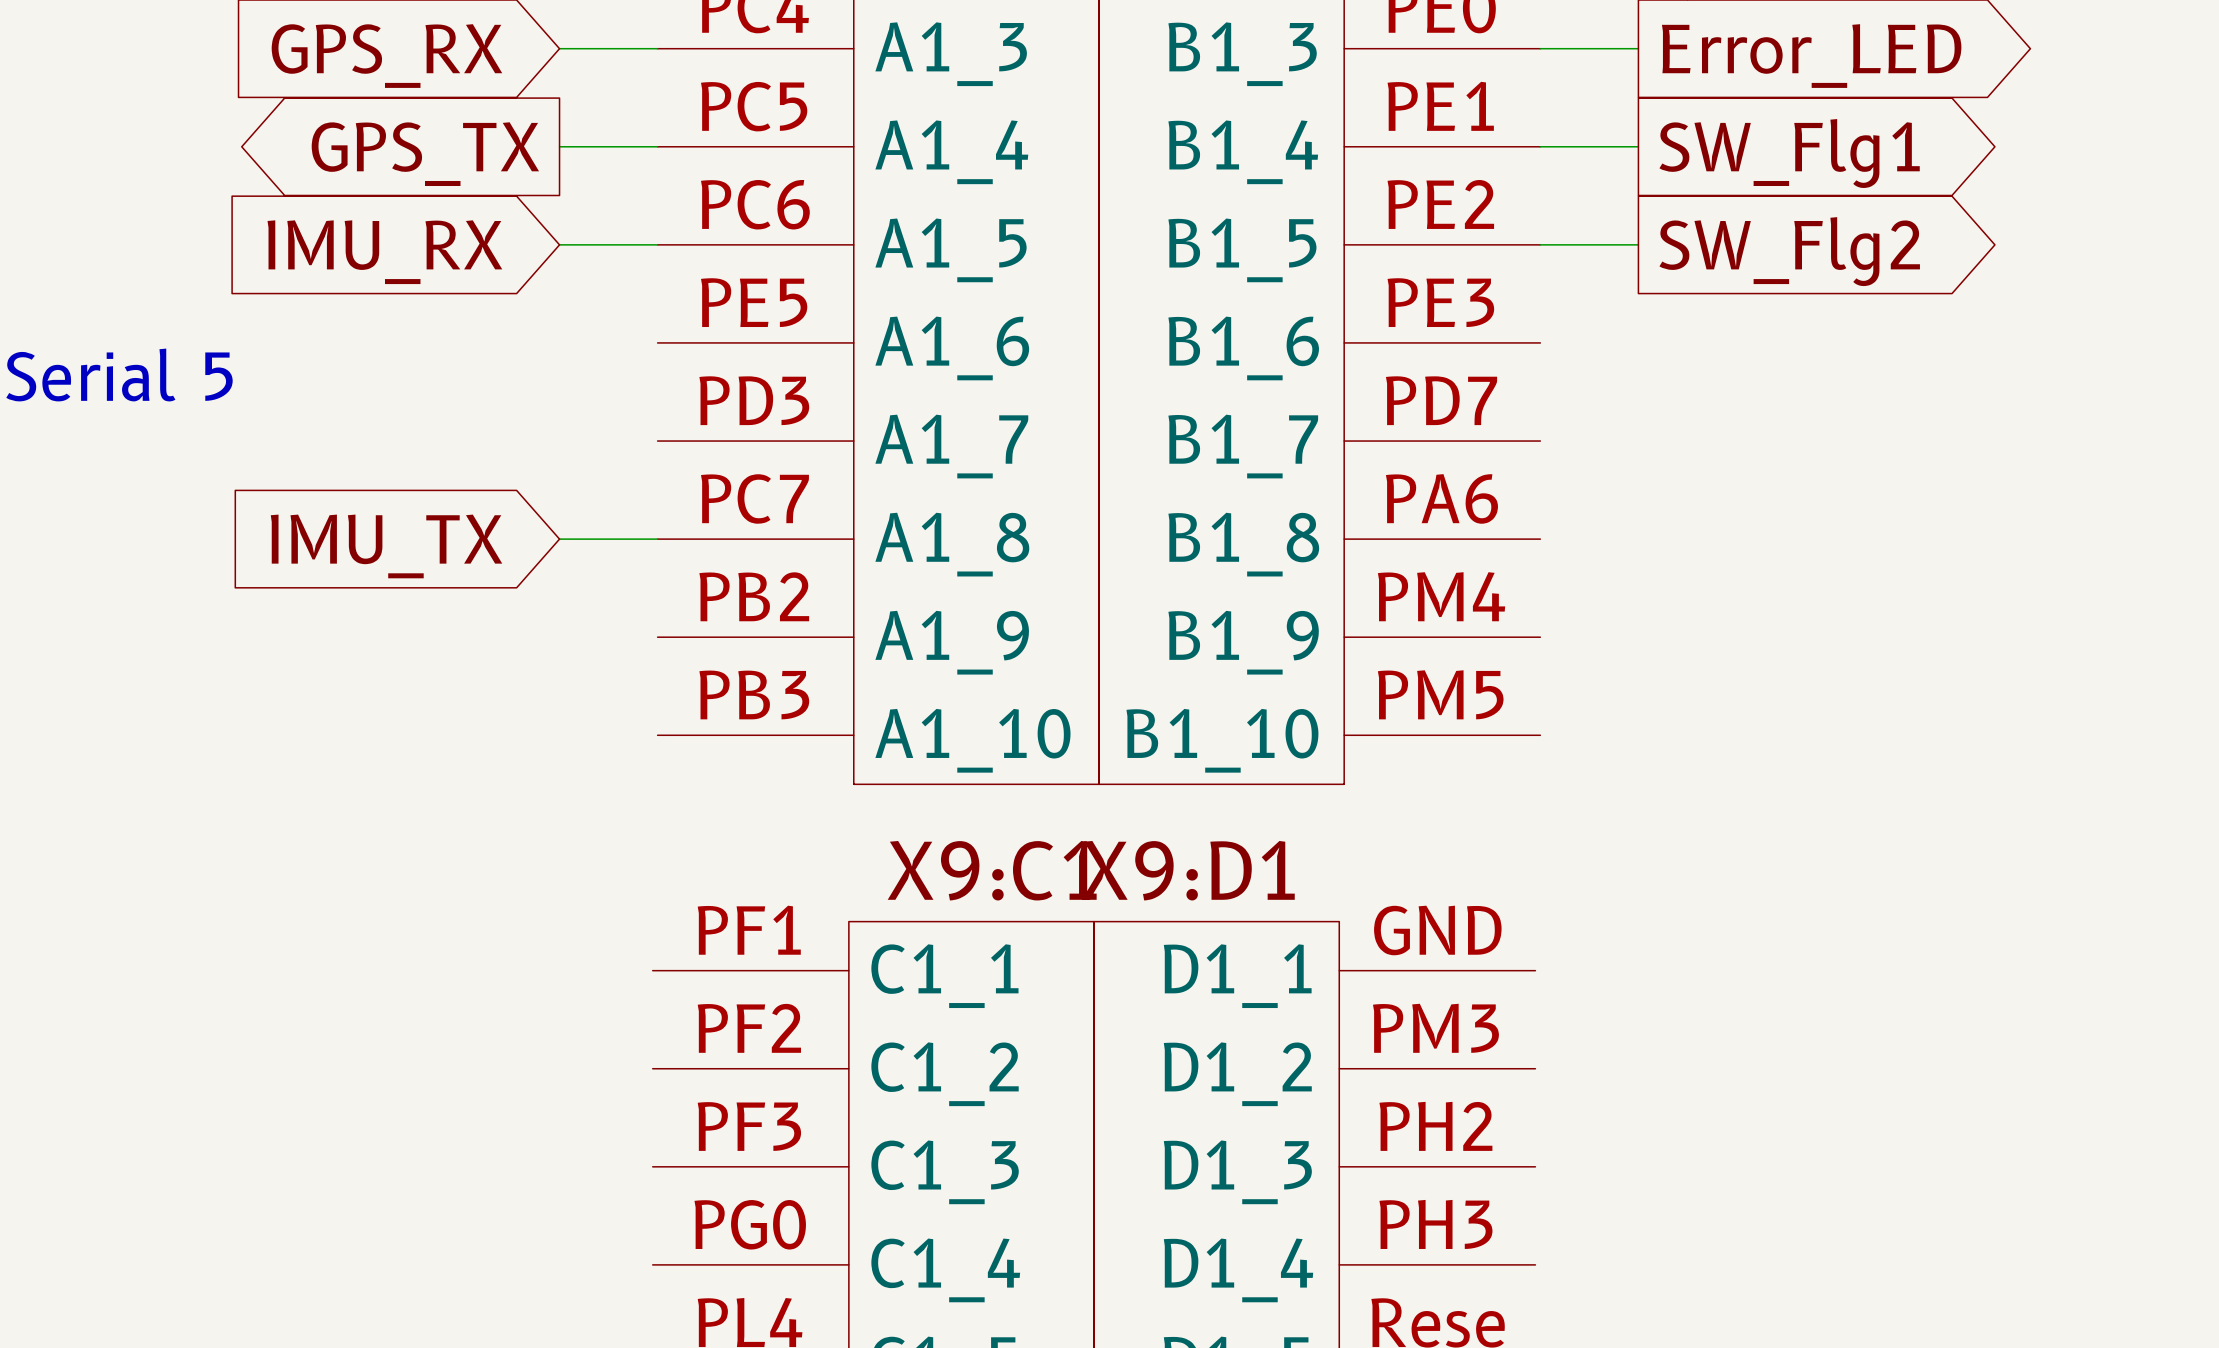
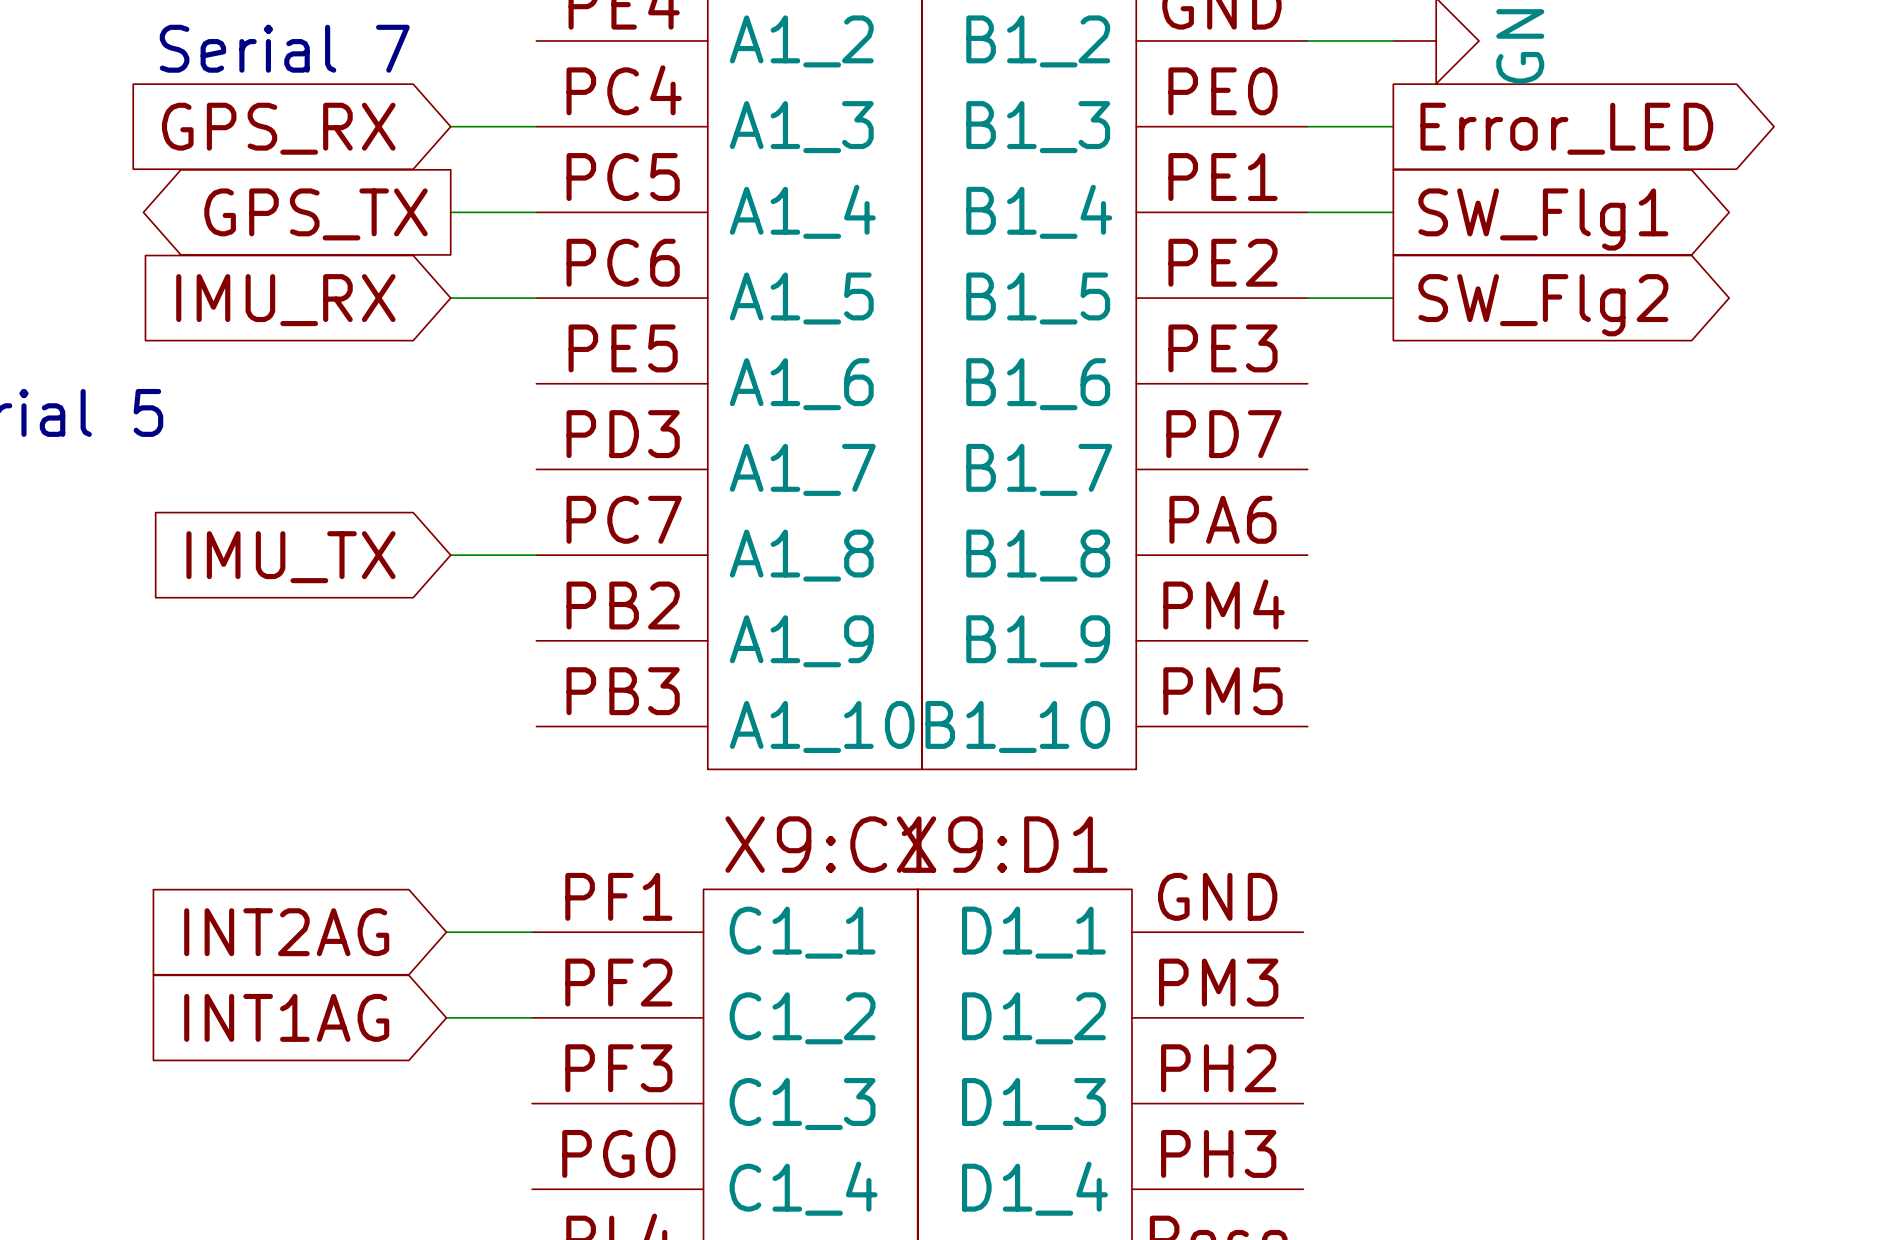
global label: none -> INT2AG (286, 932)
wire: none -> (446, 932) (532, 932)
wire: none -> (446, 1017) (532, 1017)
global label: none -> INT1AG (286, 1017)

